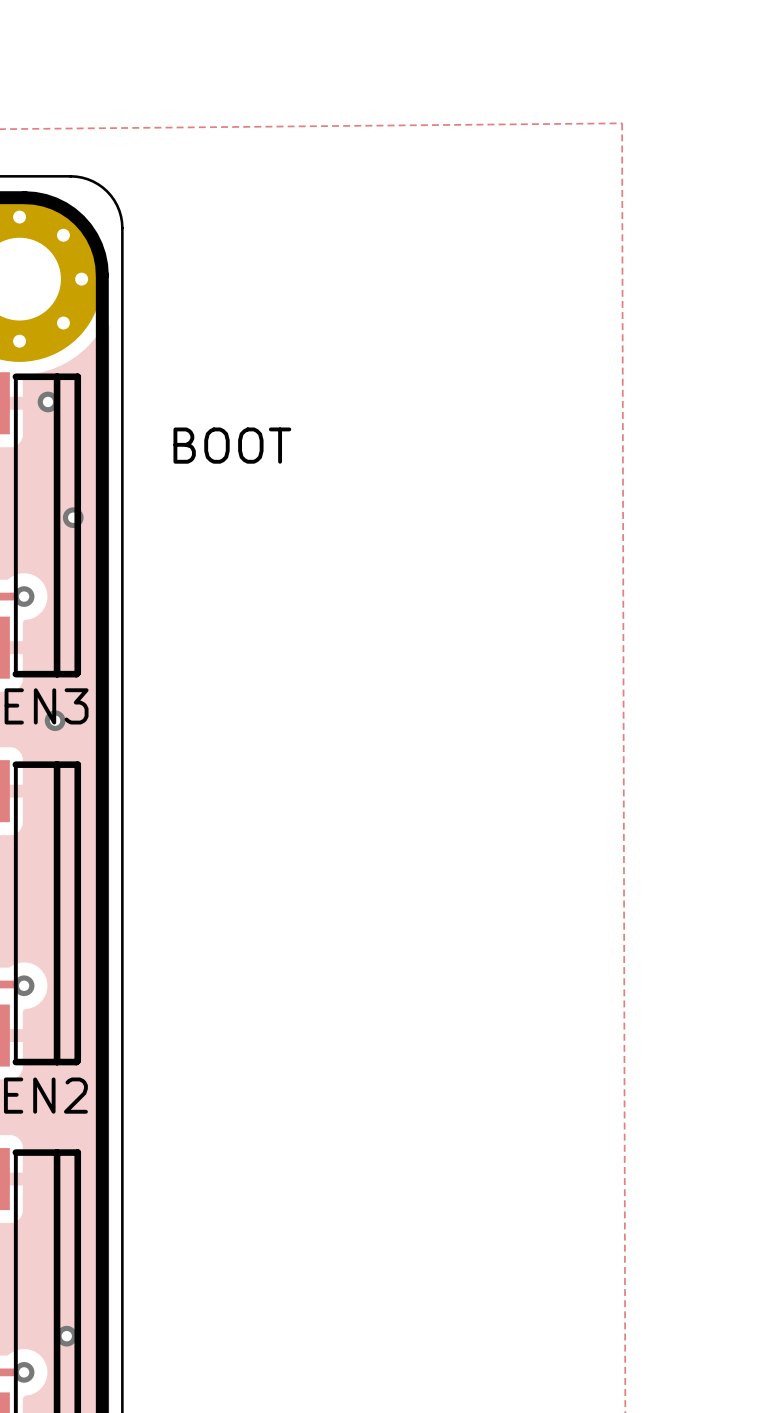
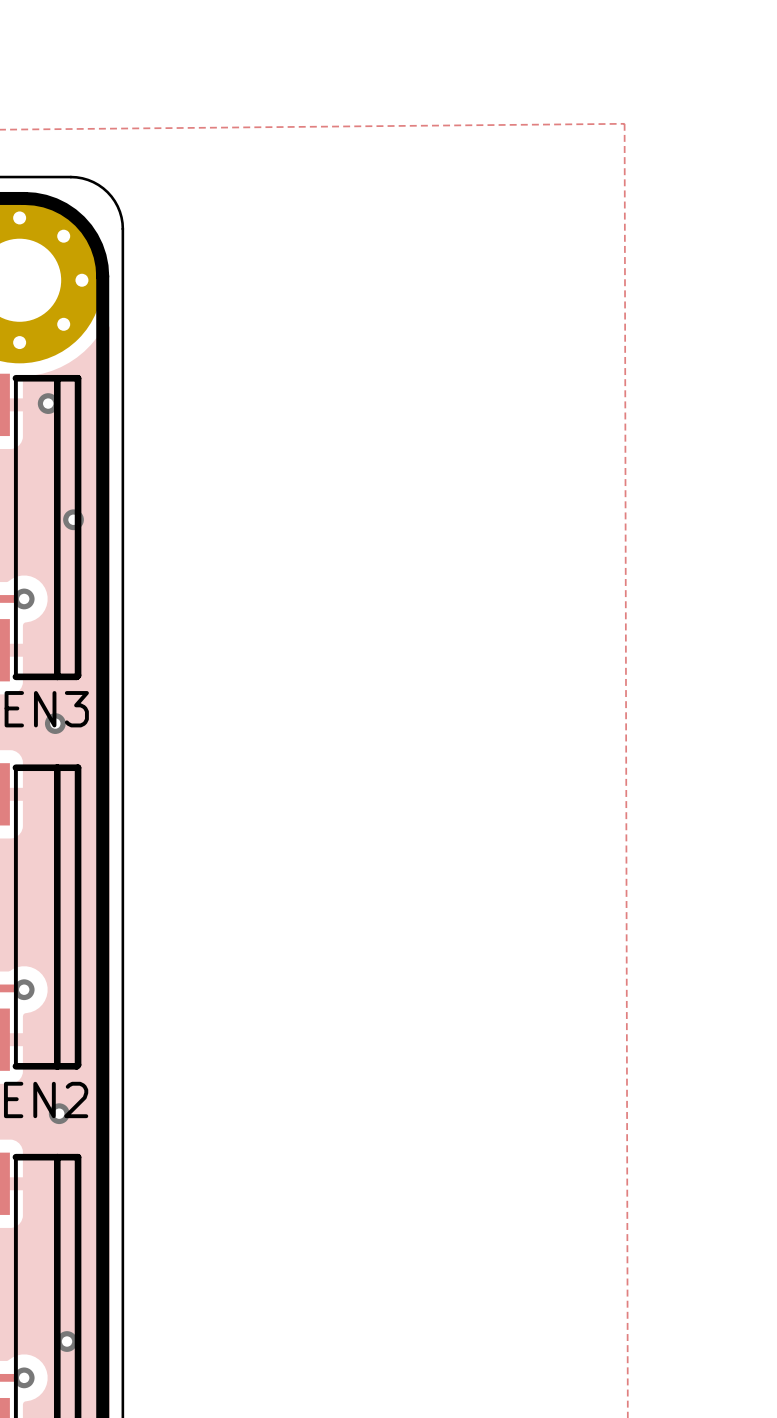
text: BOOT (232, 445) -> none
via: none -> (59, 1113)

